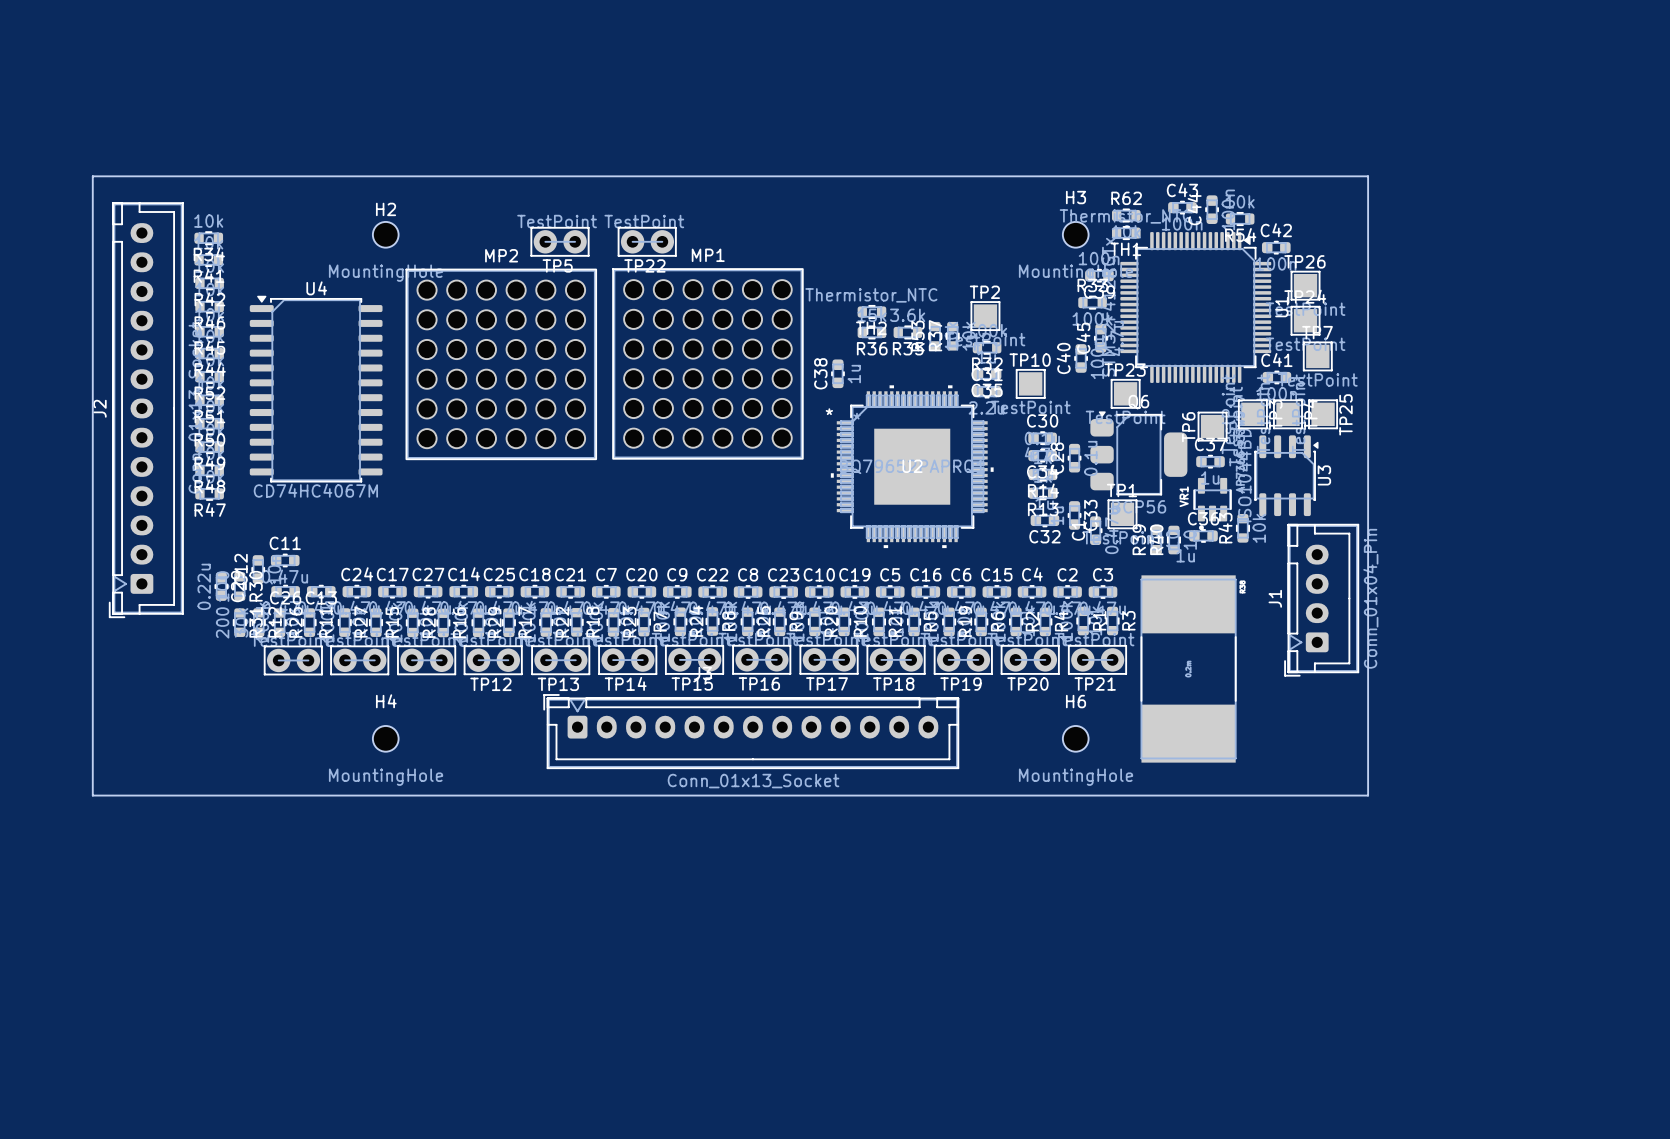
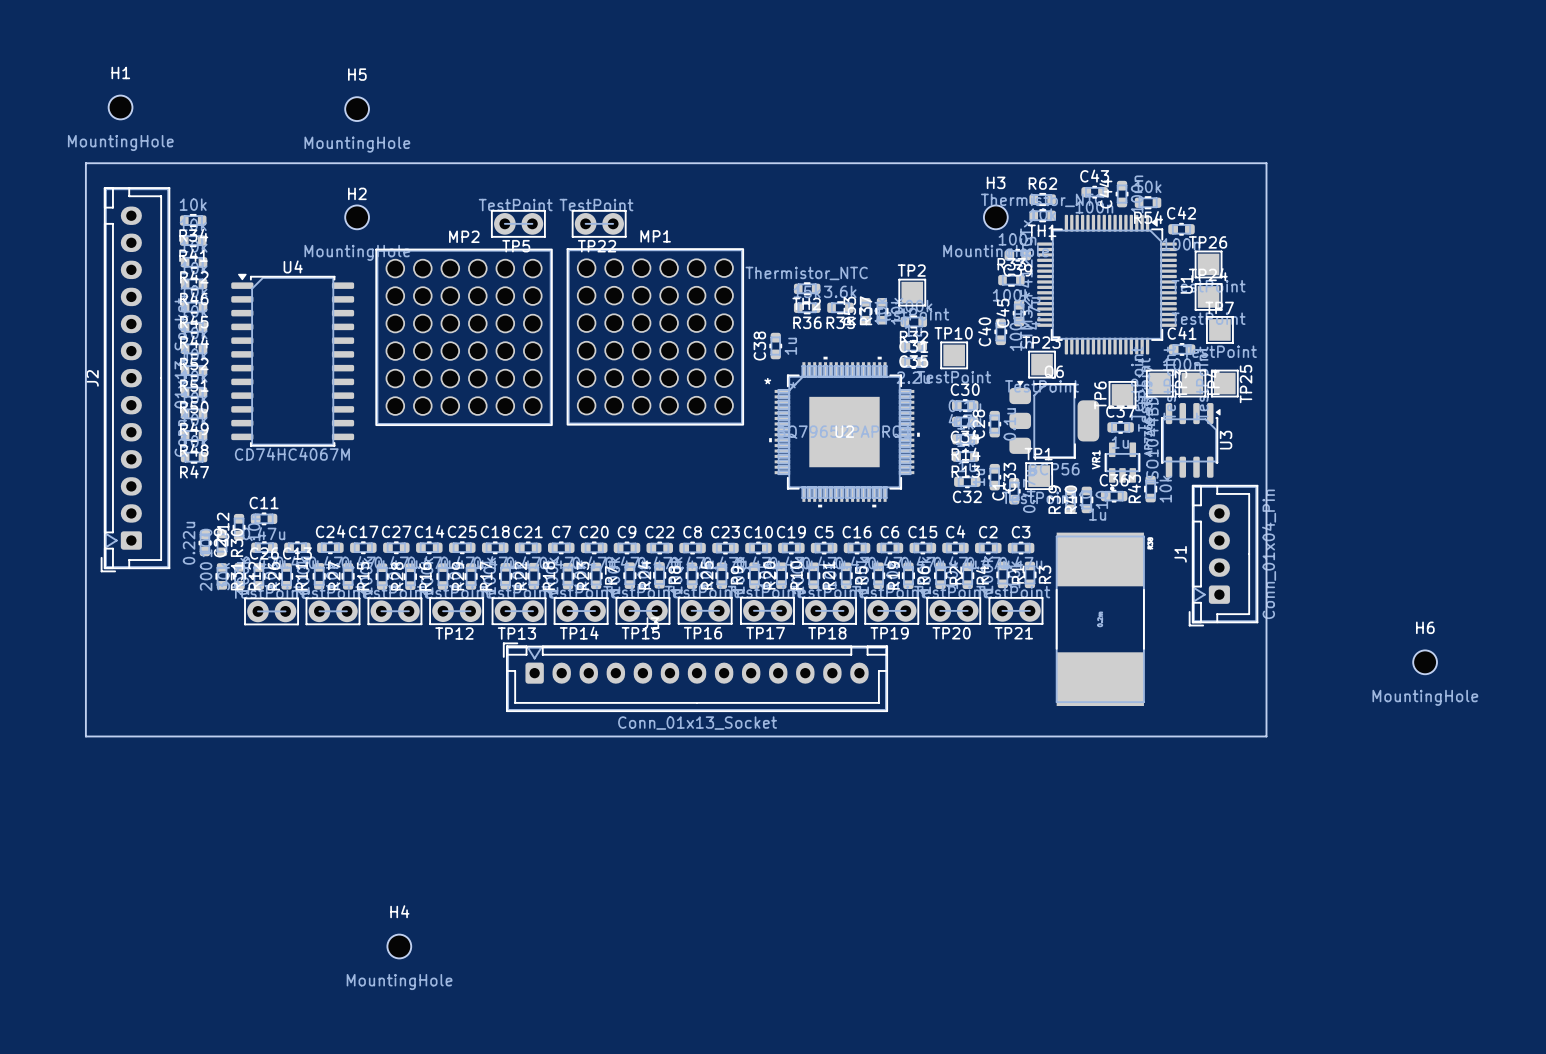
H1: none -> MountingHole (120, 107)
H5: none -> MountingHole (357, 109)
H4 position: (385, 738) -> (399, 946)
H6 position: (1075, 738) -> (1425, 662)

